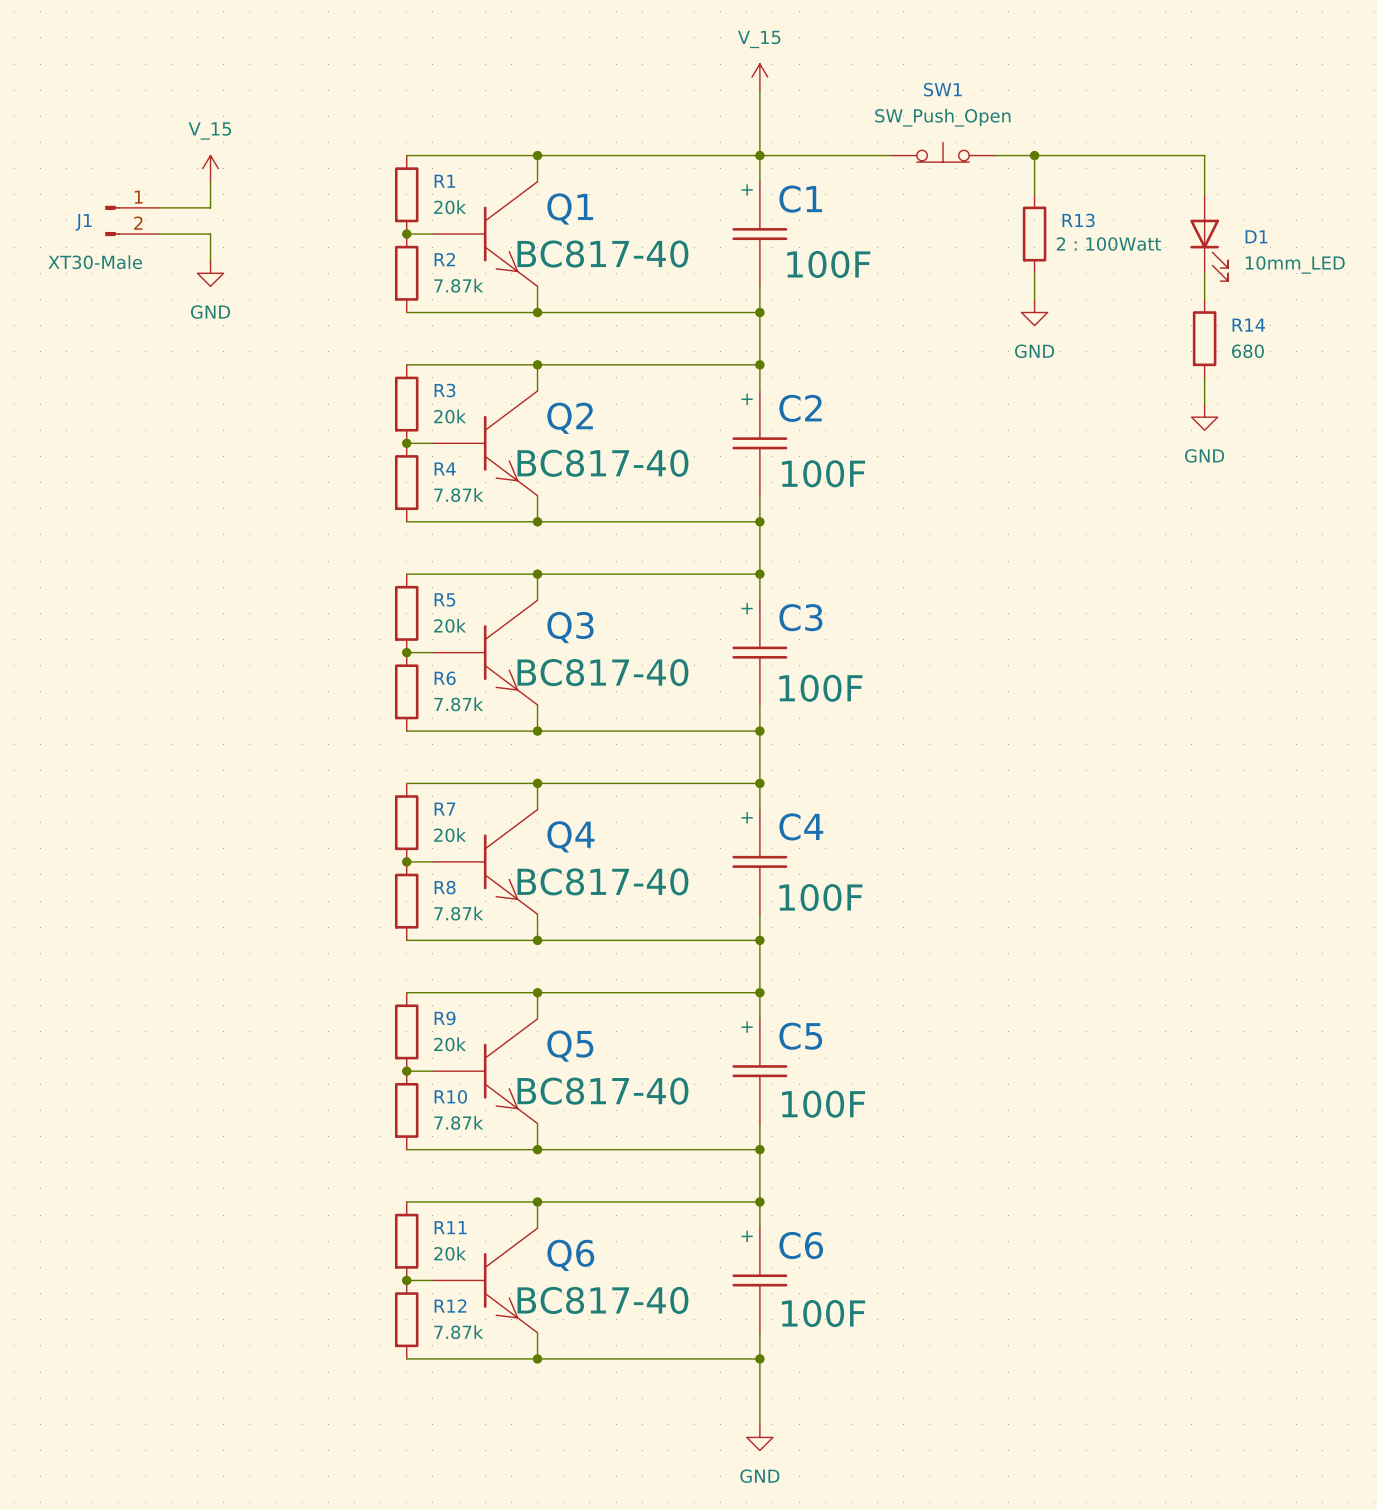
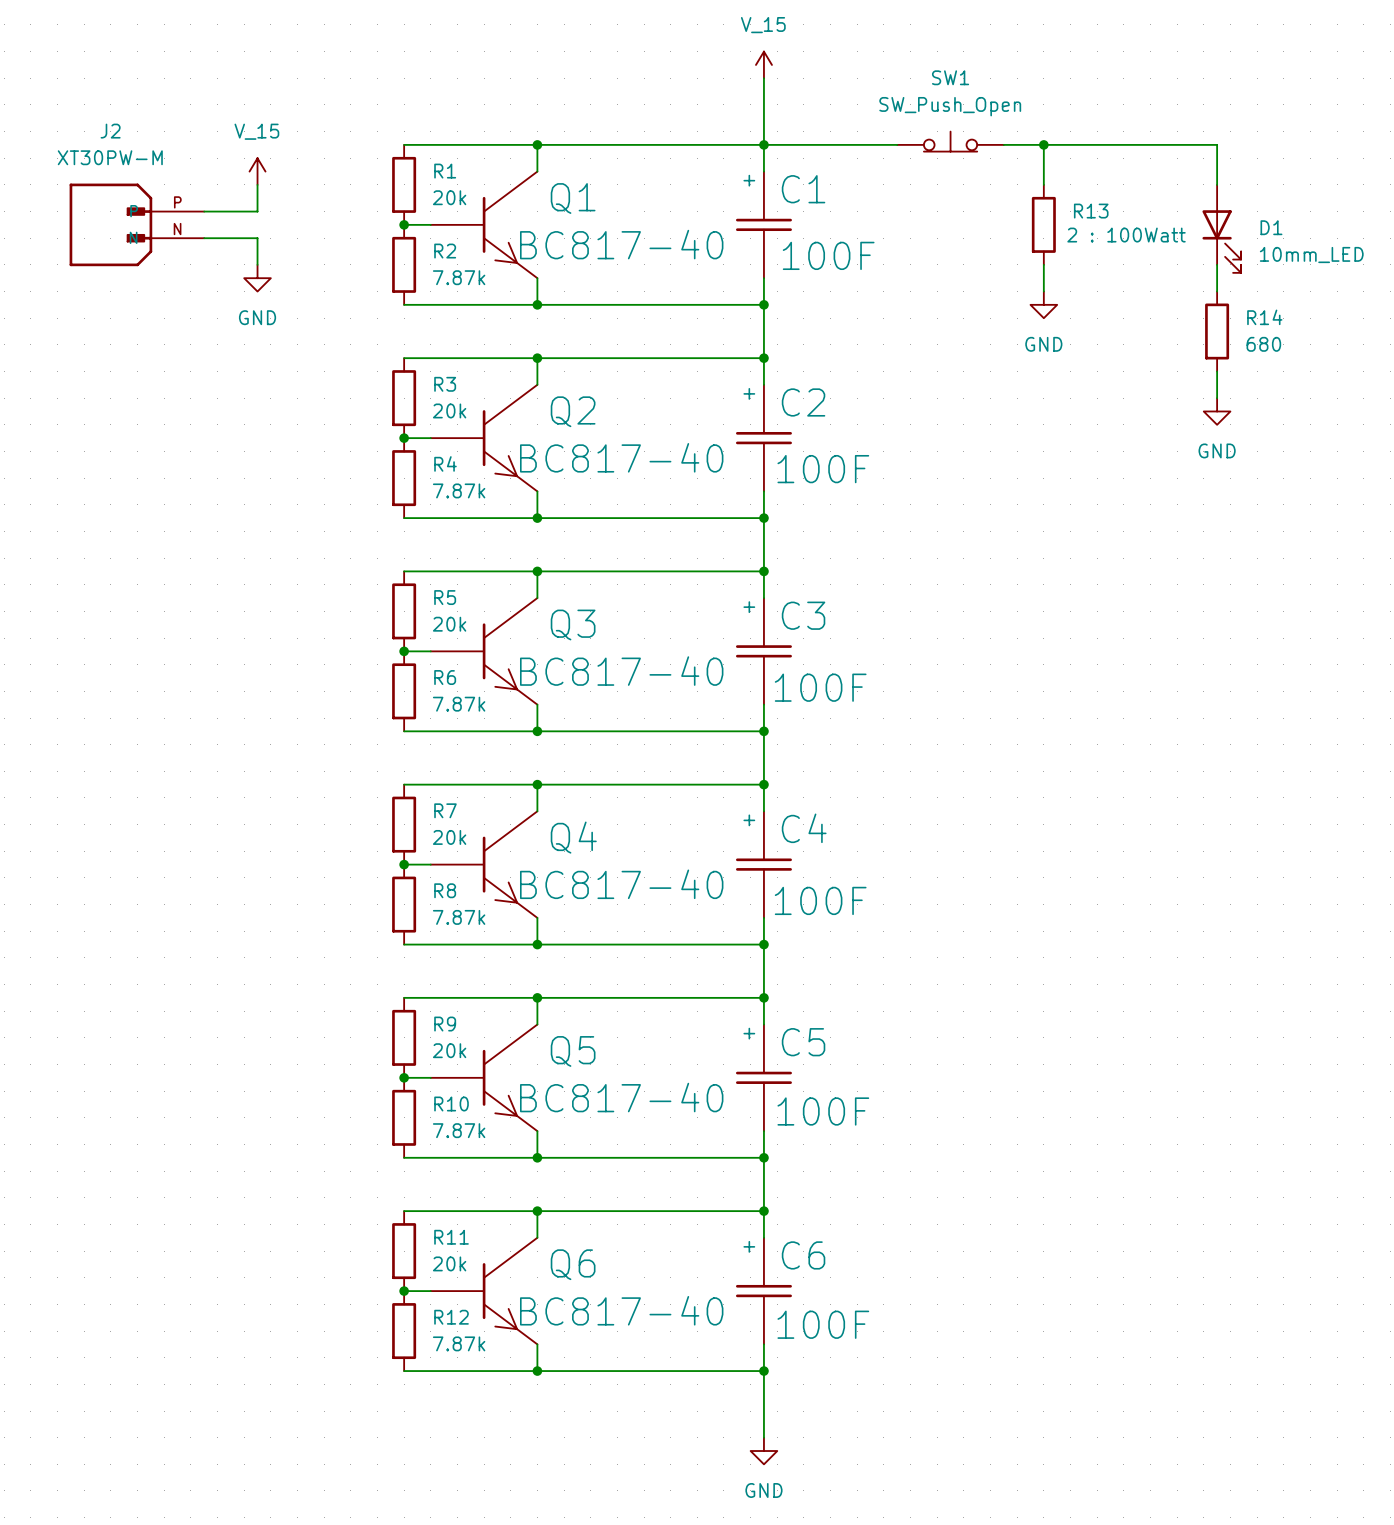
power symbol position: V_15 (210, 168) -> V_15 (257, 171)
wire: (210, 181) (210, 207) (158, 207) -> (257, 184) (257, 211) (204, 211)
J1: XT30-Male (131, 220) -> none
J2: none -> XT30PW-M (136, 224)
wire: (158, 234) (210, 234) (210, 260) -> (204, 238) (257, 238) (257, 264)
power symbol position: GND (210, 273) -> GND (257, 278)

